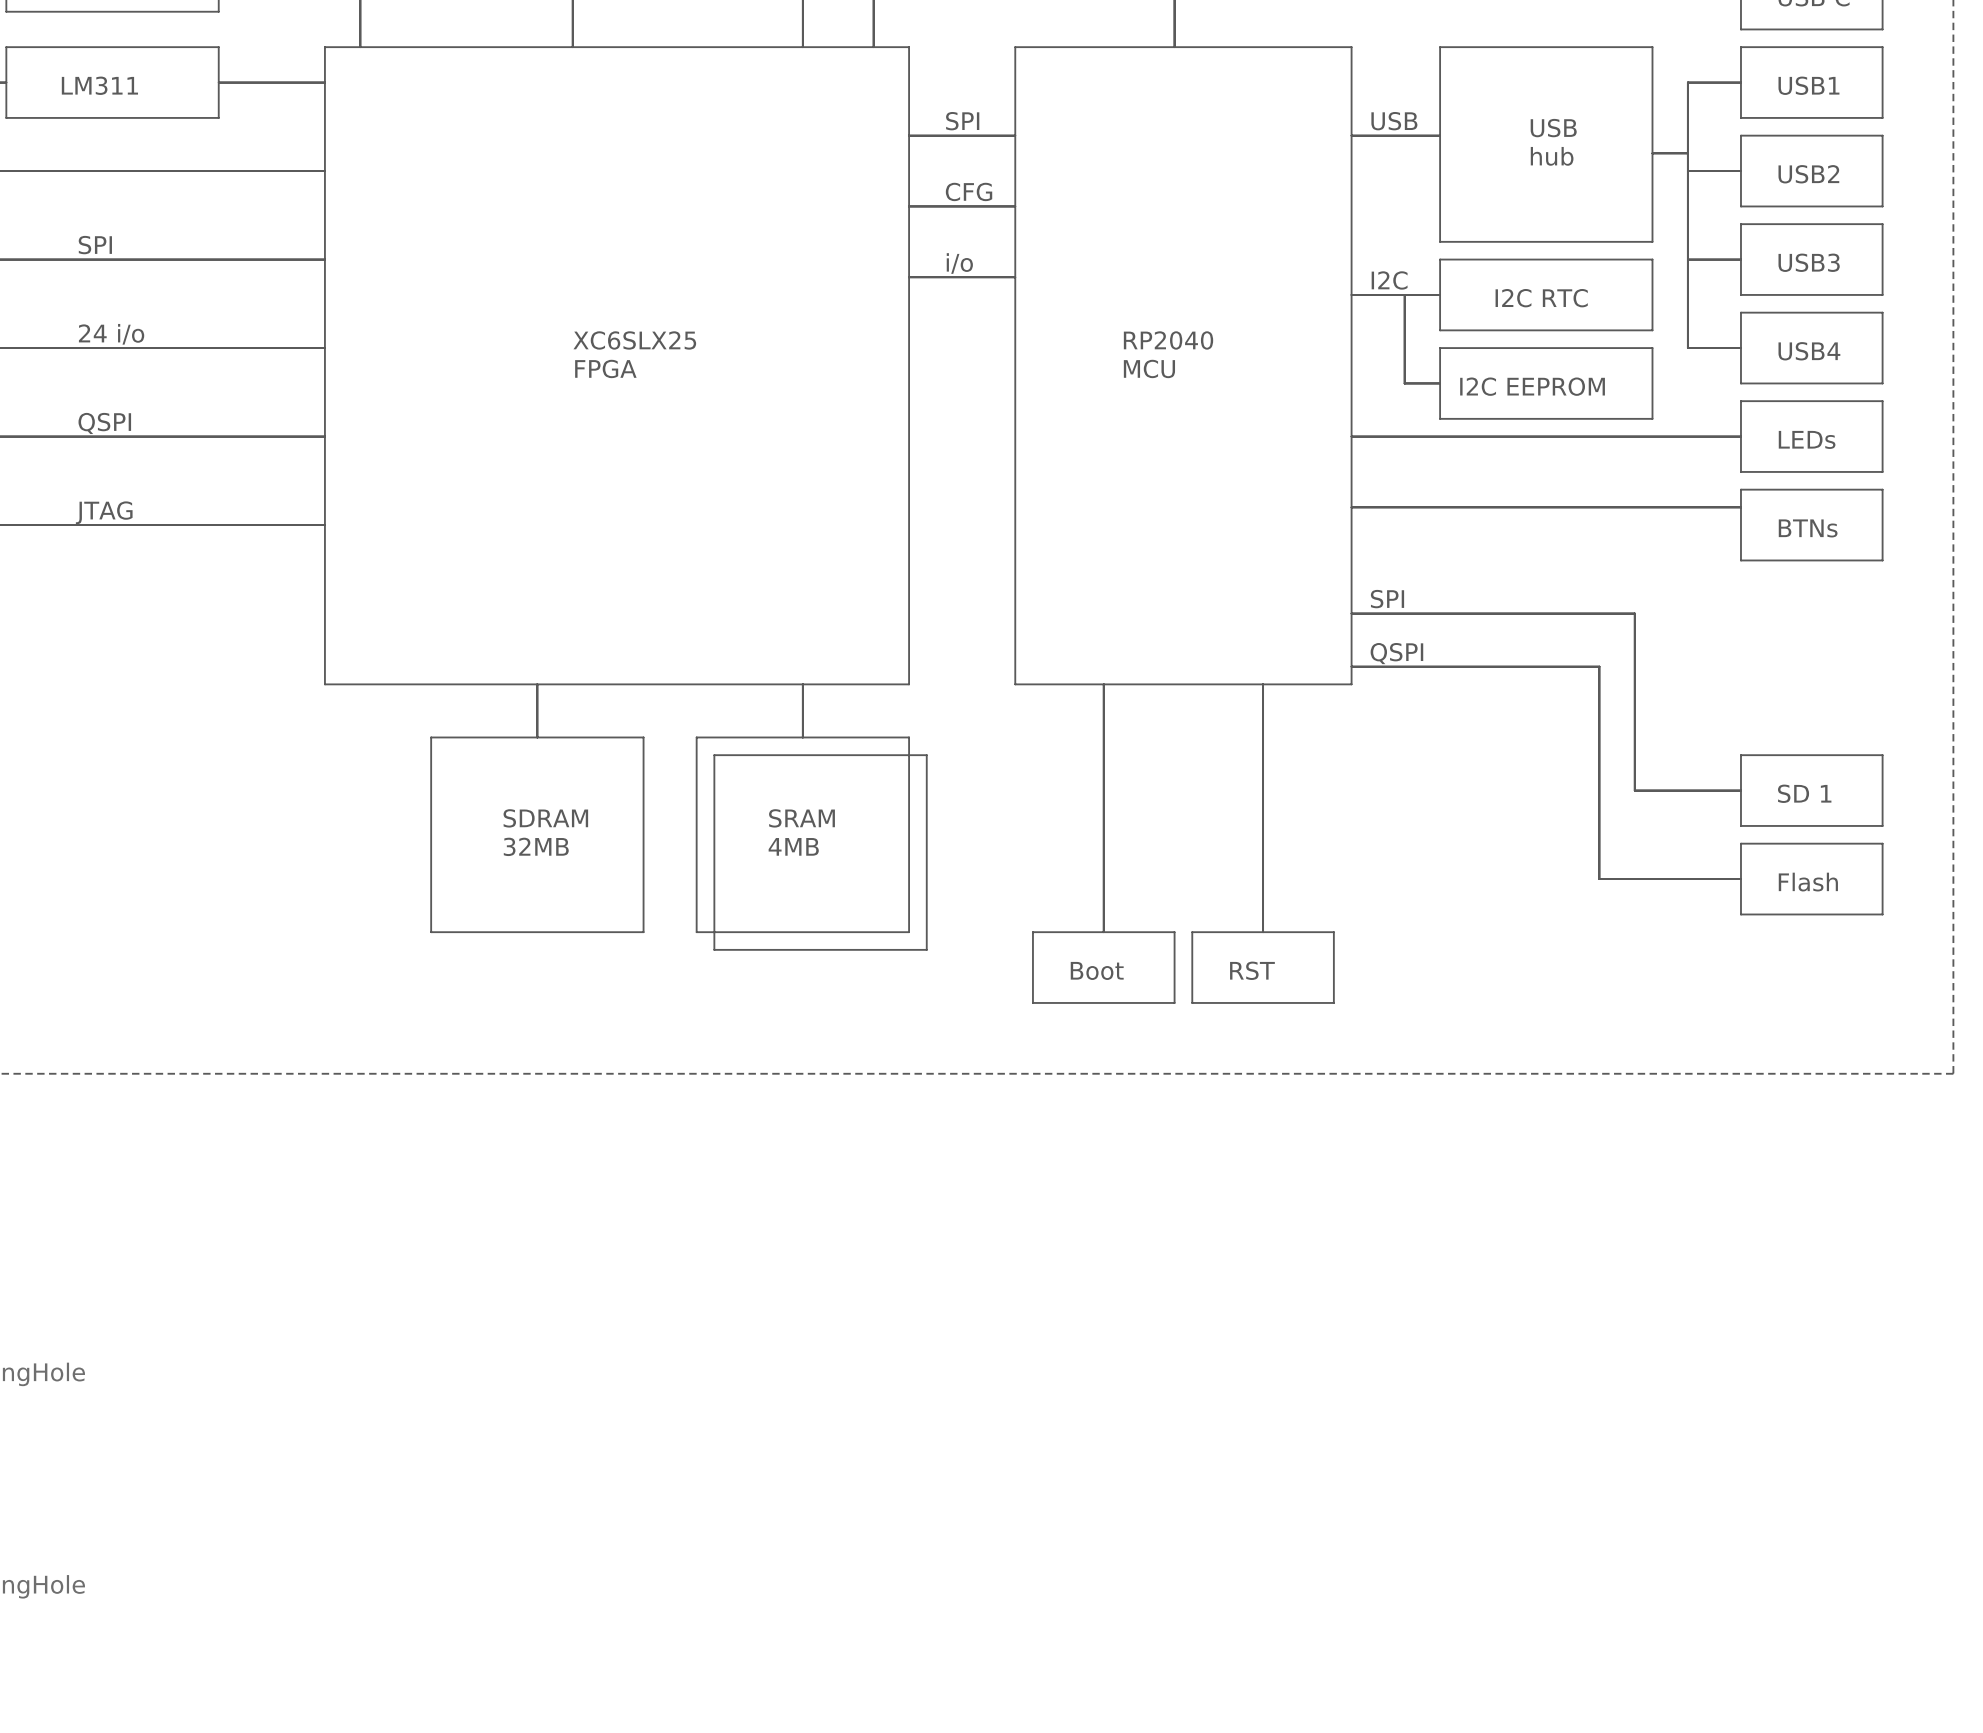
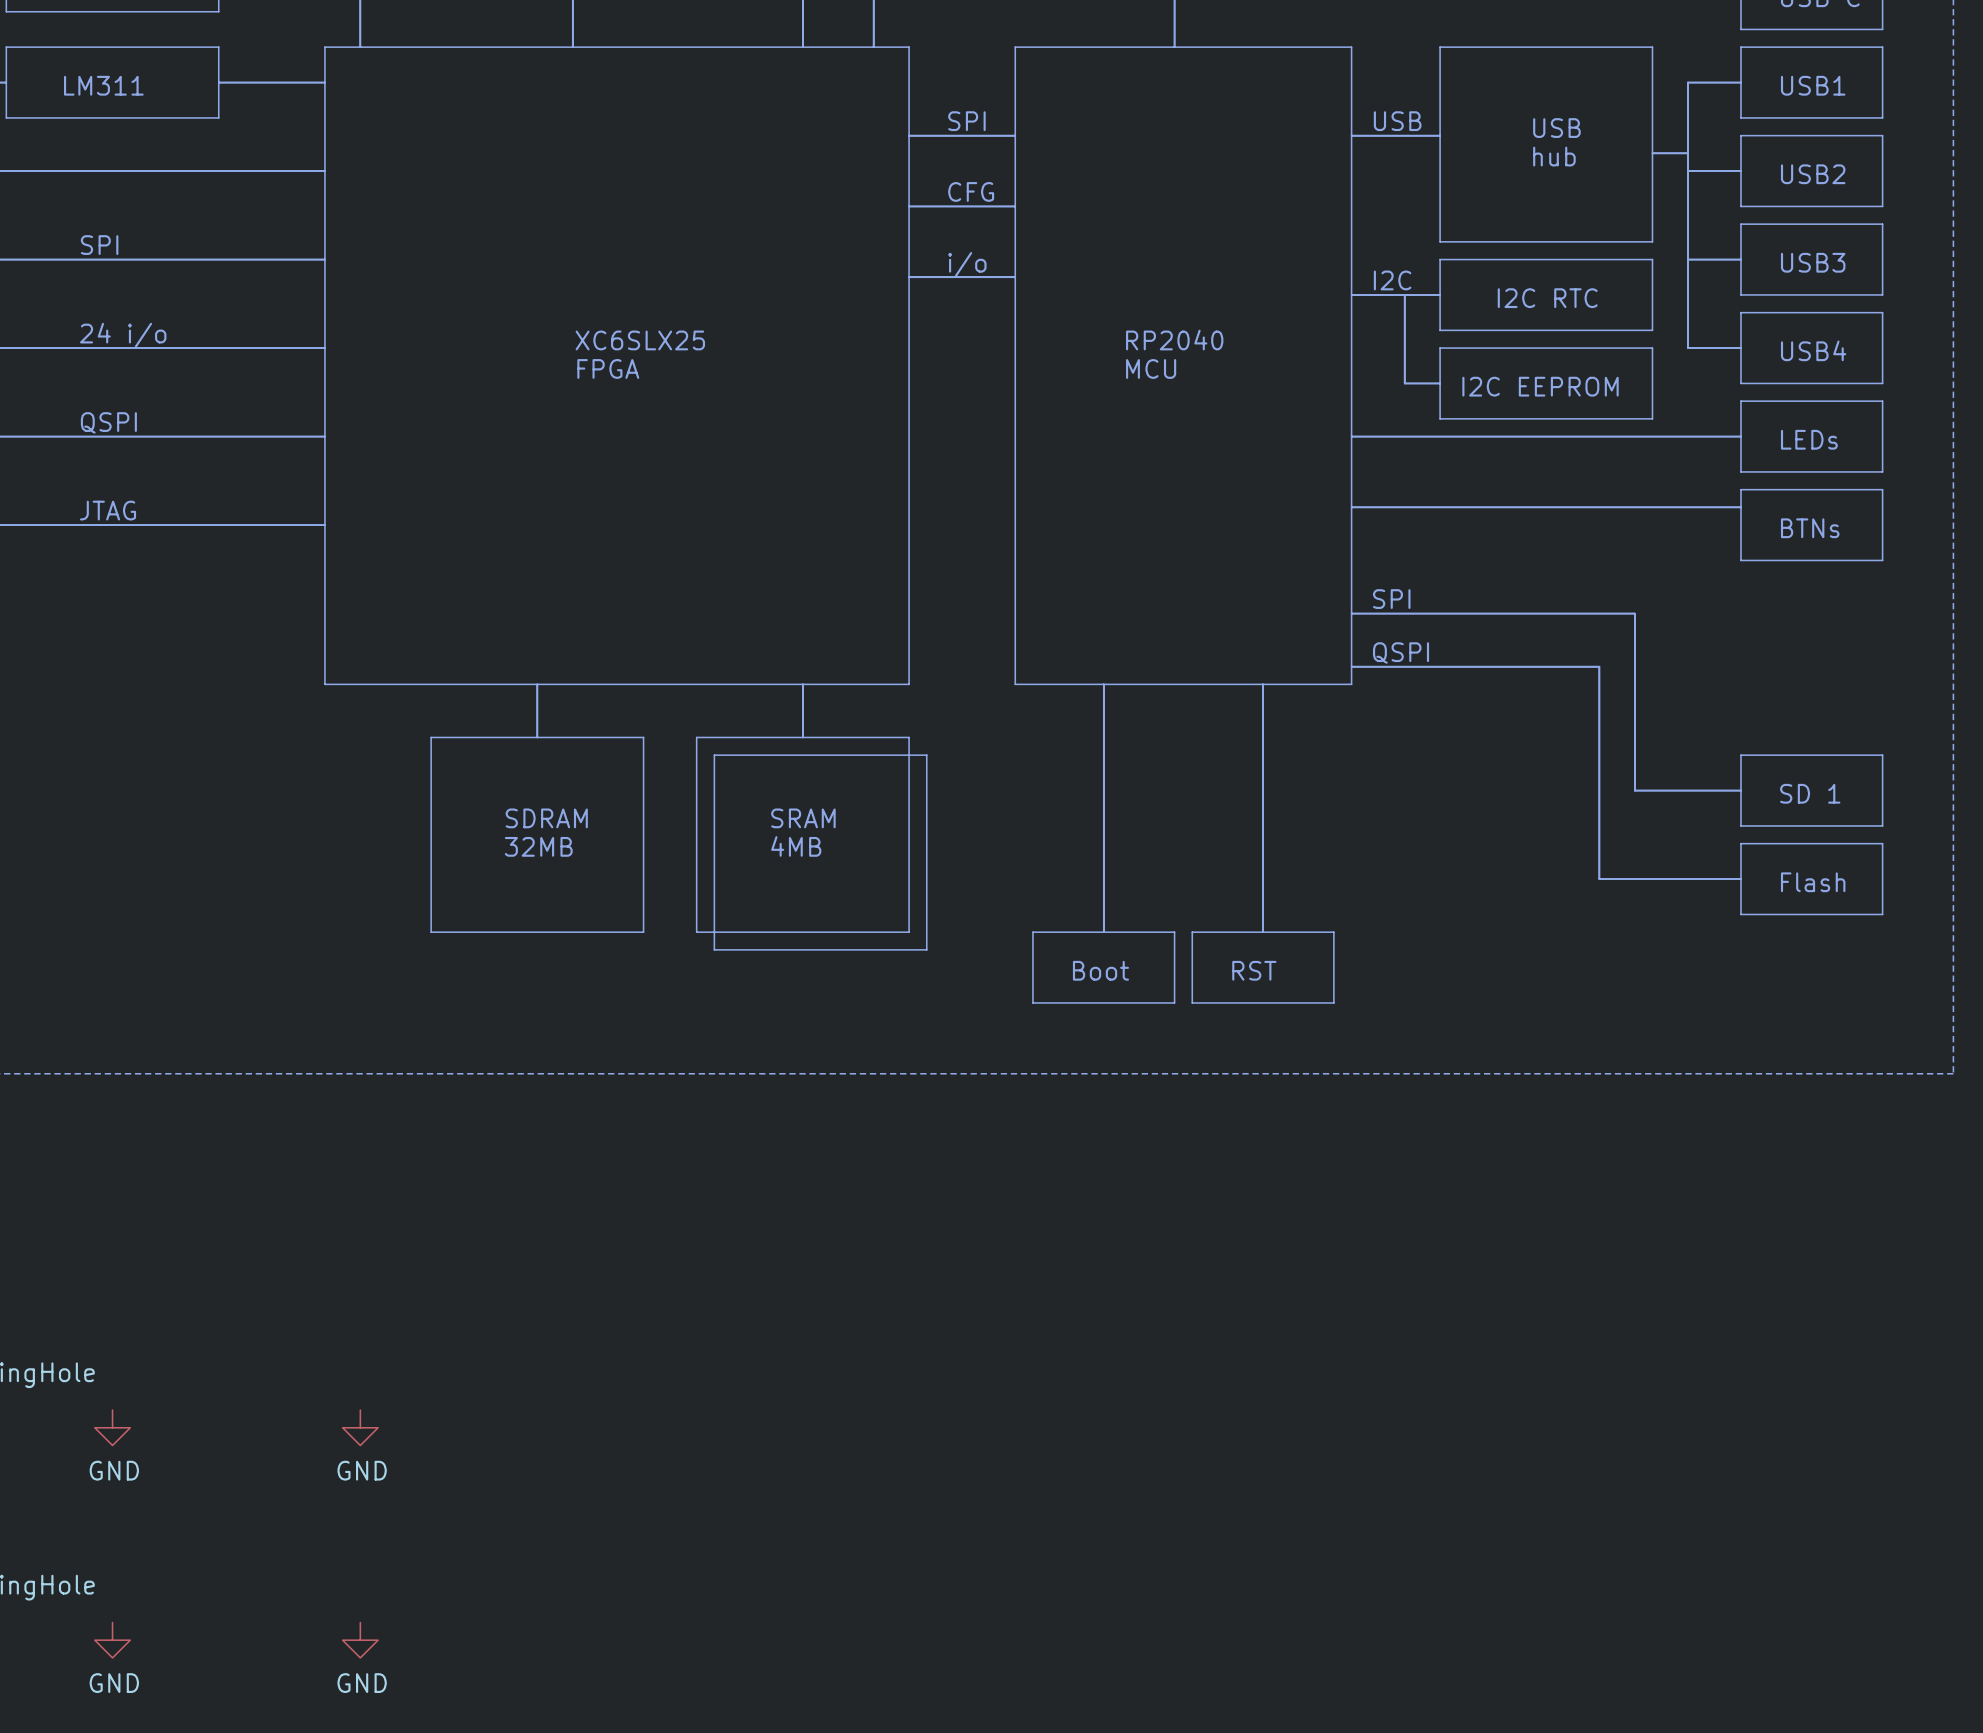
power symbol: none -> GND (112, 1427)
power symbol: none -> GND (360, 1427)
power symbol: none -> GND (112, 1640)
power symbol: none -> GND (360, 1640)

